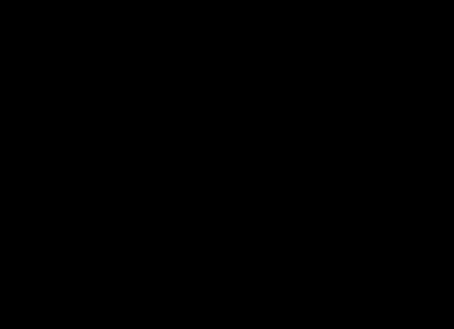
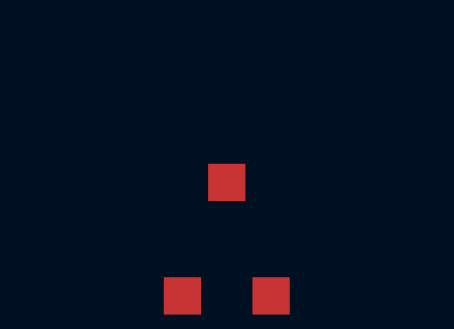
part: none -> (226, 239)

